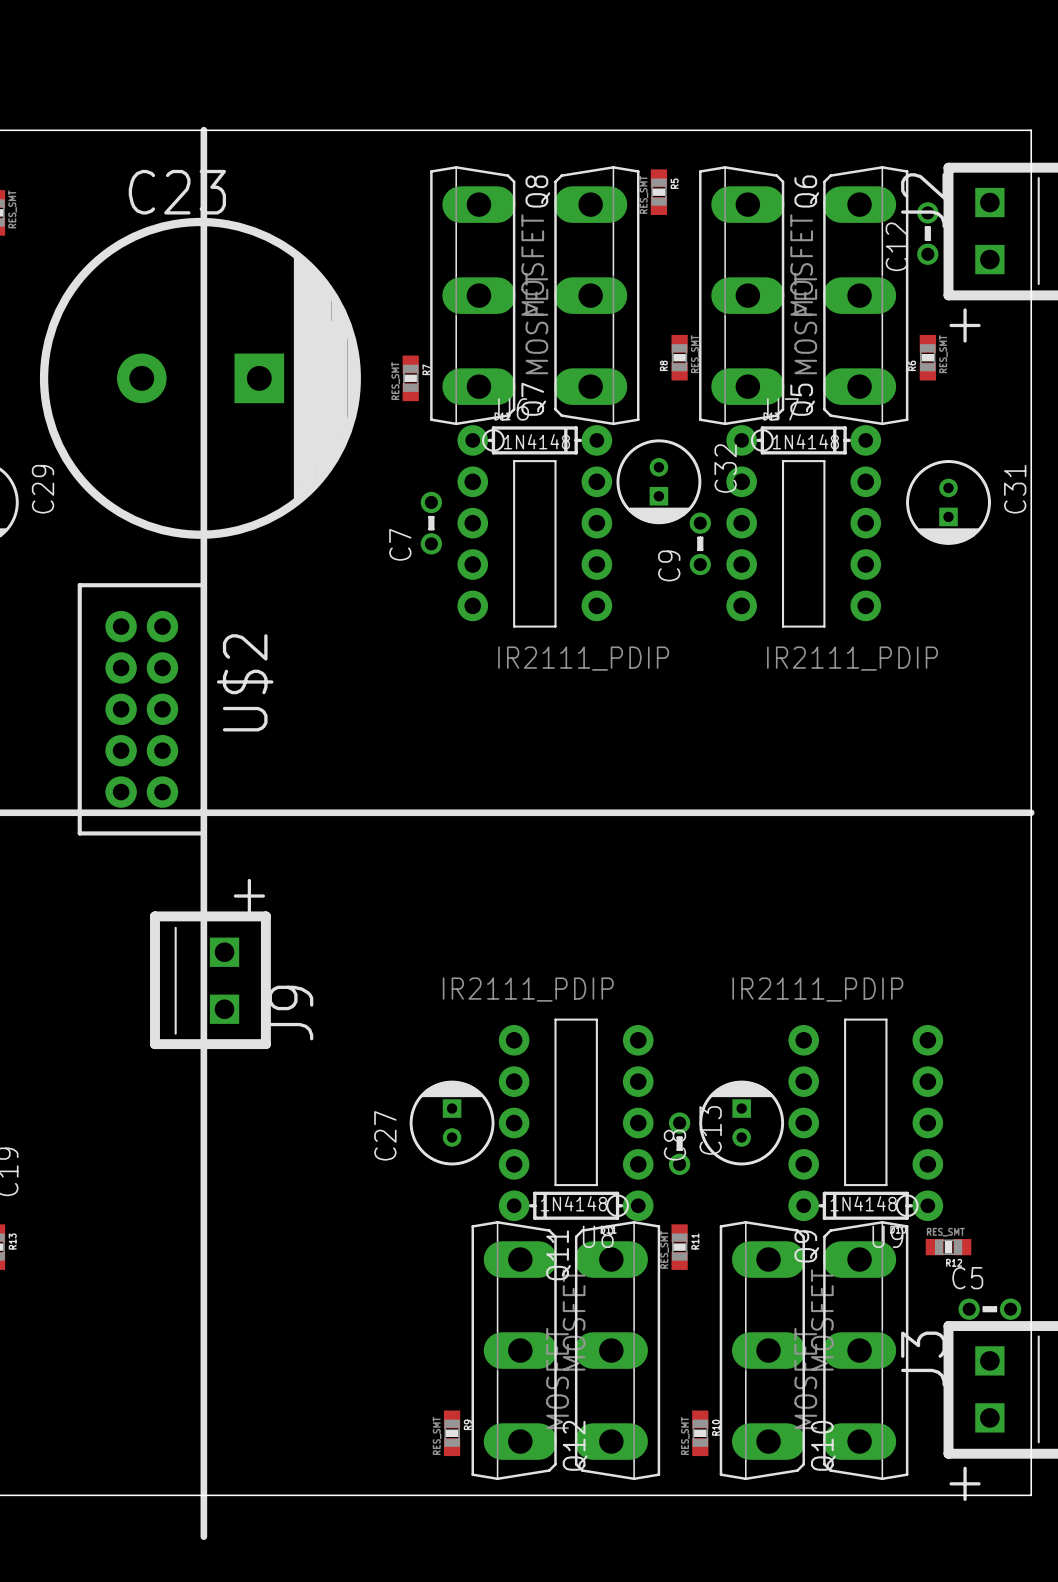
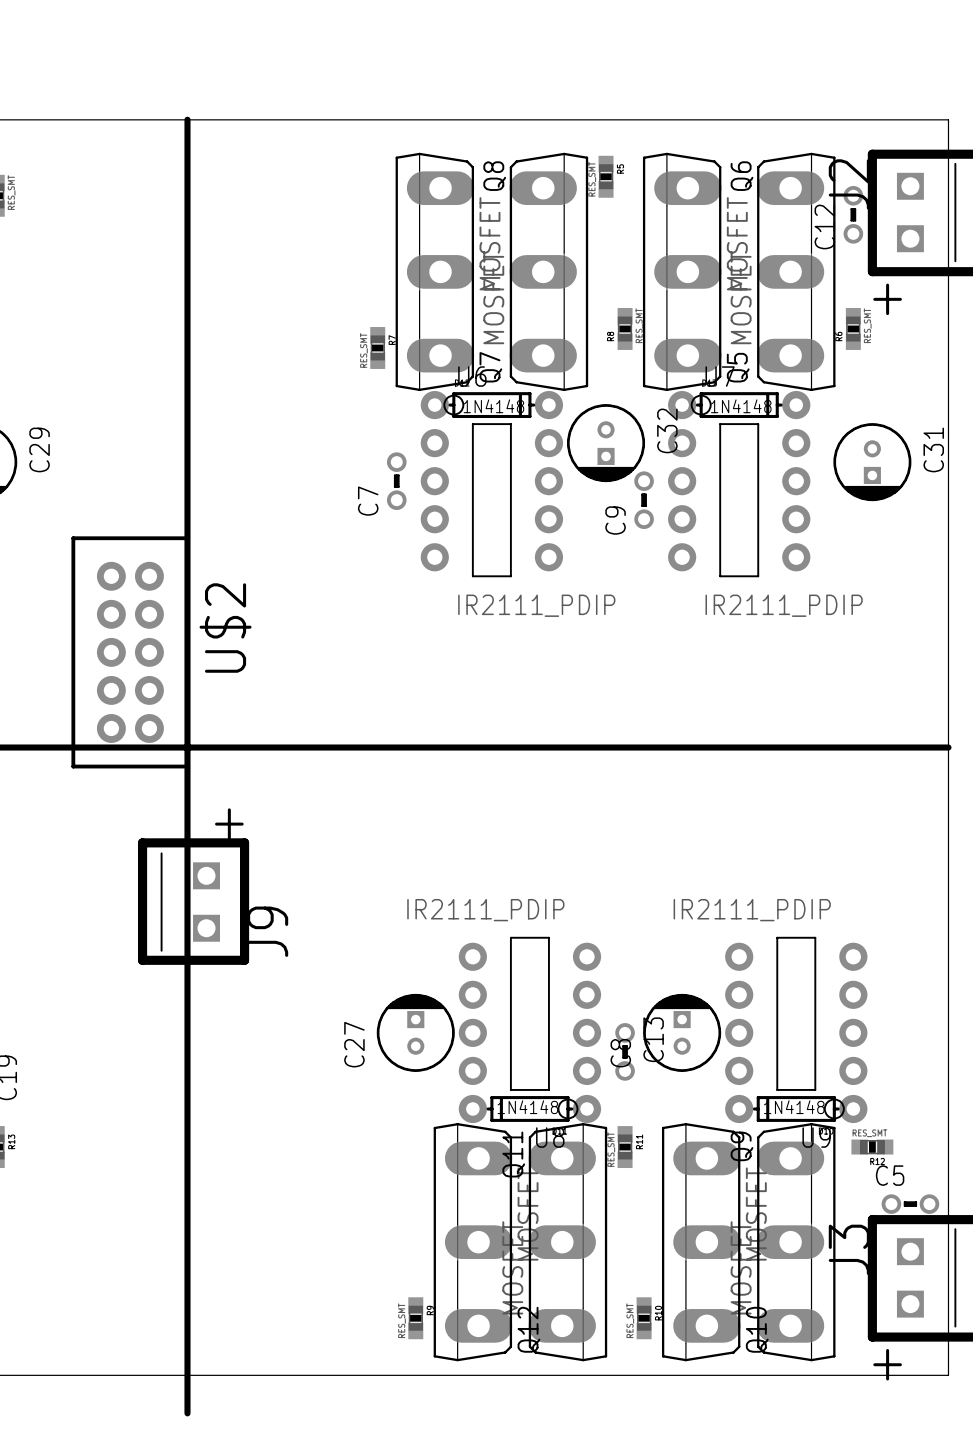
C23: (200, 378) -> none

